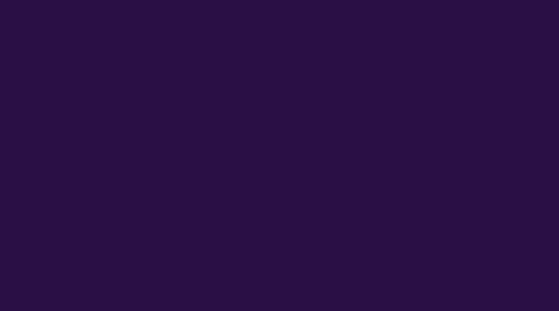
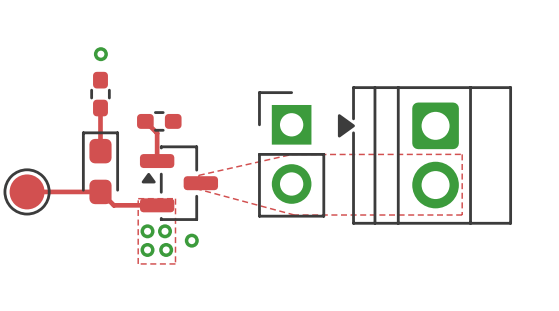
via: none -> (100, 54)
part: none -> (100, 94)
track: none -> (100, 108) (100, 151)
track: none -> (145, 121) (157, 133) (157, 161)
part: none -> (159, 121)
part: none -> (291, 154)
zone outline: none -> (462, 154) (291, 154) (198, 175) (198, 189) (294, 215) (462, 215) (462, 154)
part: none -> (424, 155)
part: none -> (100, 167)
part: none -> (178, 183)
track: none -> (27, 191) (100, 191) (113, 205) (157, 205)
part: none -> (27, 191)
zone outline: none -> (138, 198) (138, 263) (175, 263) (175, 198) (138, 198)
via: none -> (147, 231)
via: none -> (165, 231)
via: none -> (191, 240)
via: none -> (147, 249)
via: none -> (166, 249)

